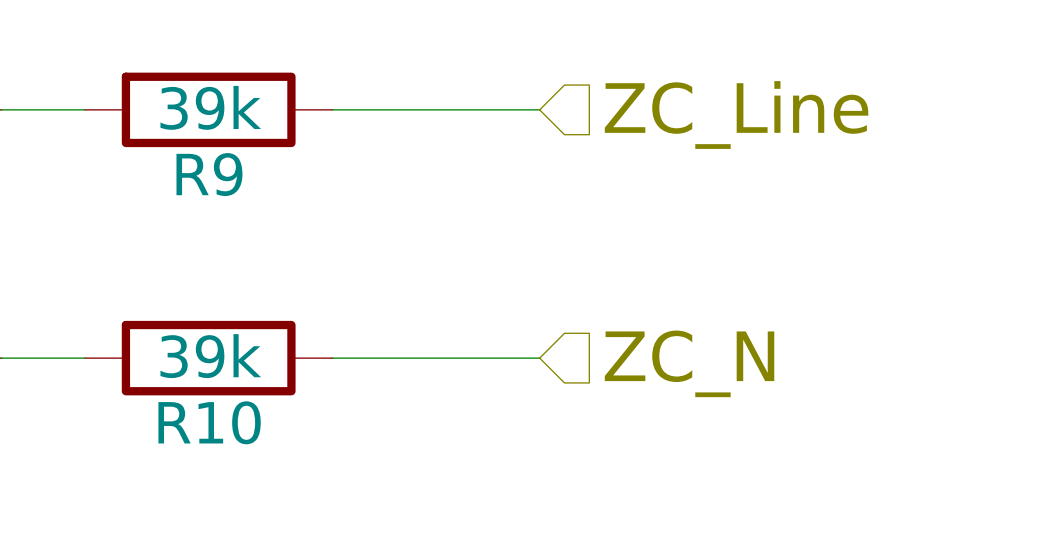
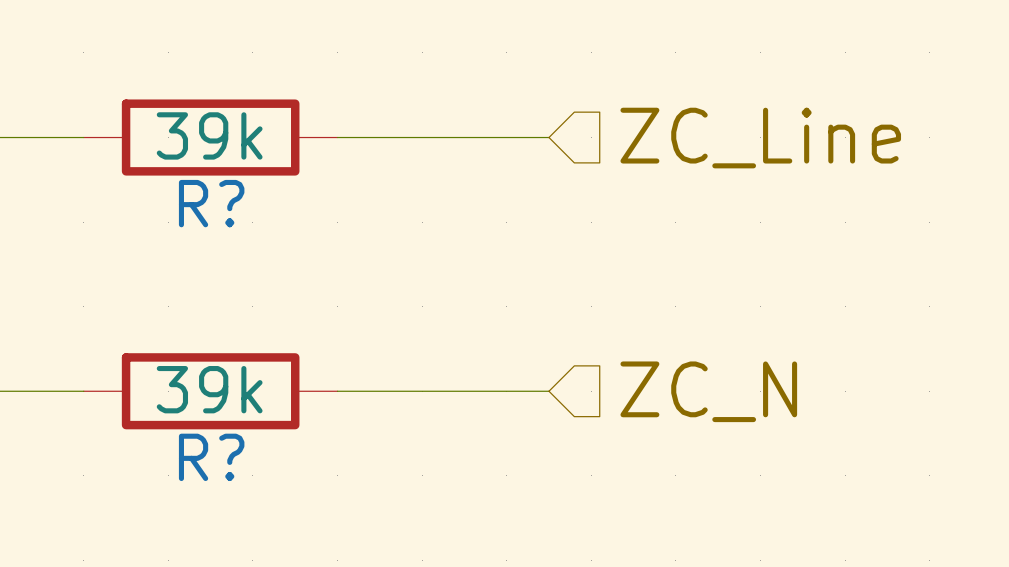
R9 name: R9 (209, 174) -> R? (211, 203)
R10 name: R10 (209, 422) -> R? (211, 457)

